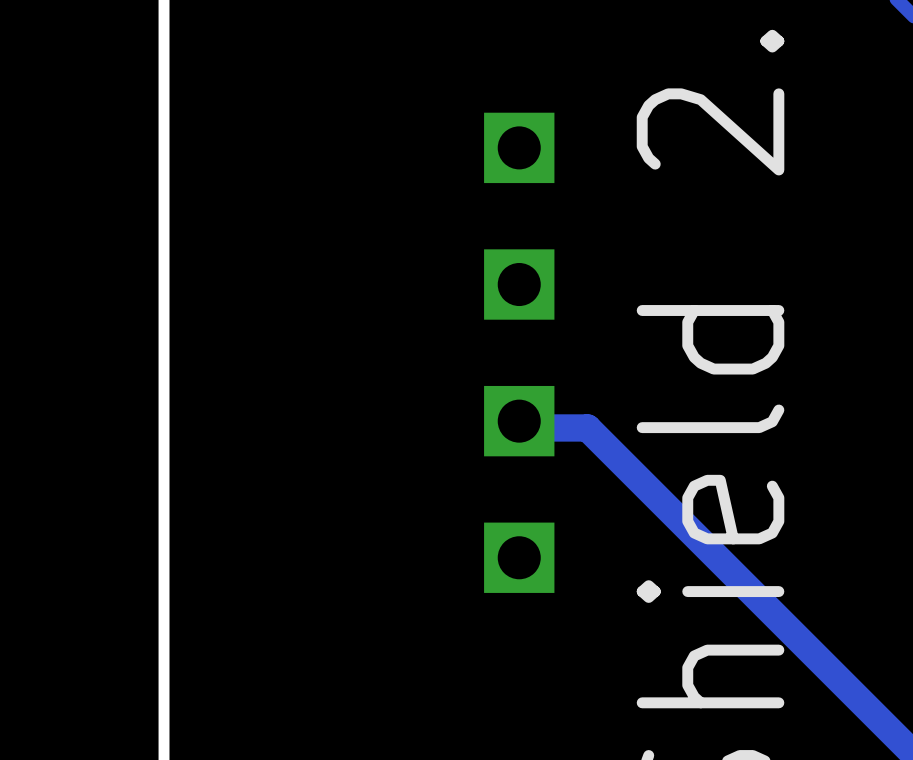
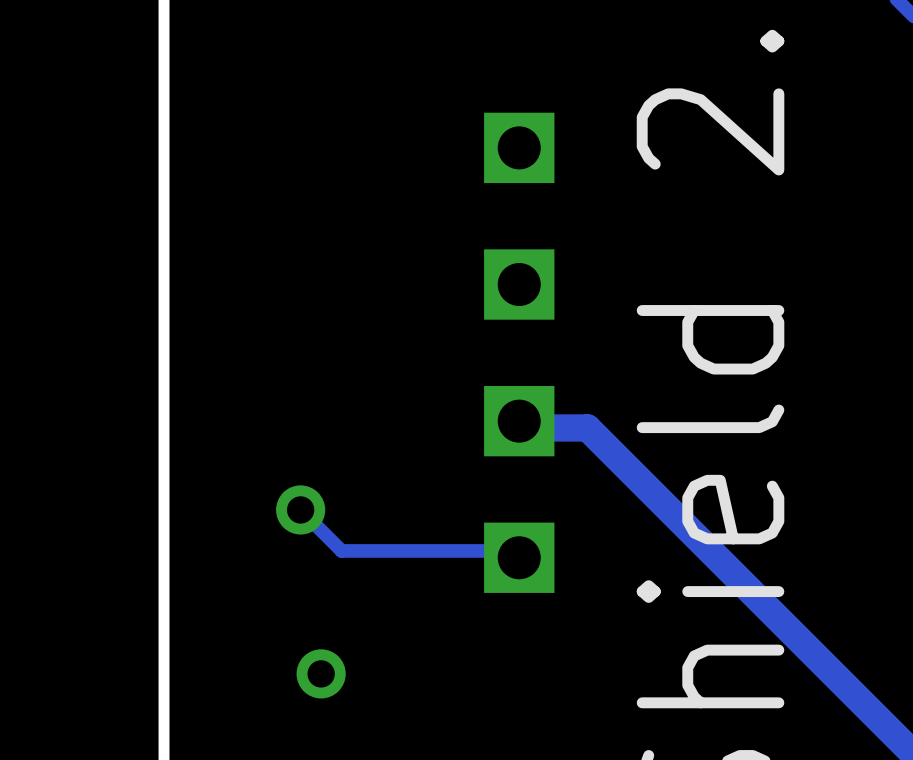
track: none -> (300, 509) (341, 550) (505, 550) (519, 557)
via: none -> (300, 509)
via: none -> (321, 673)

